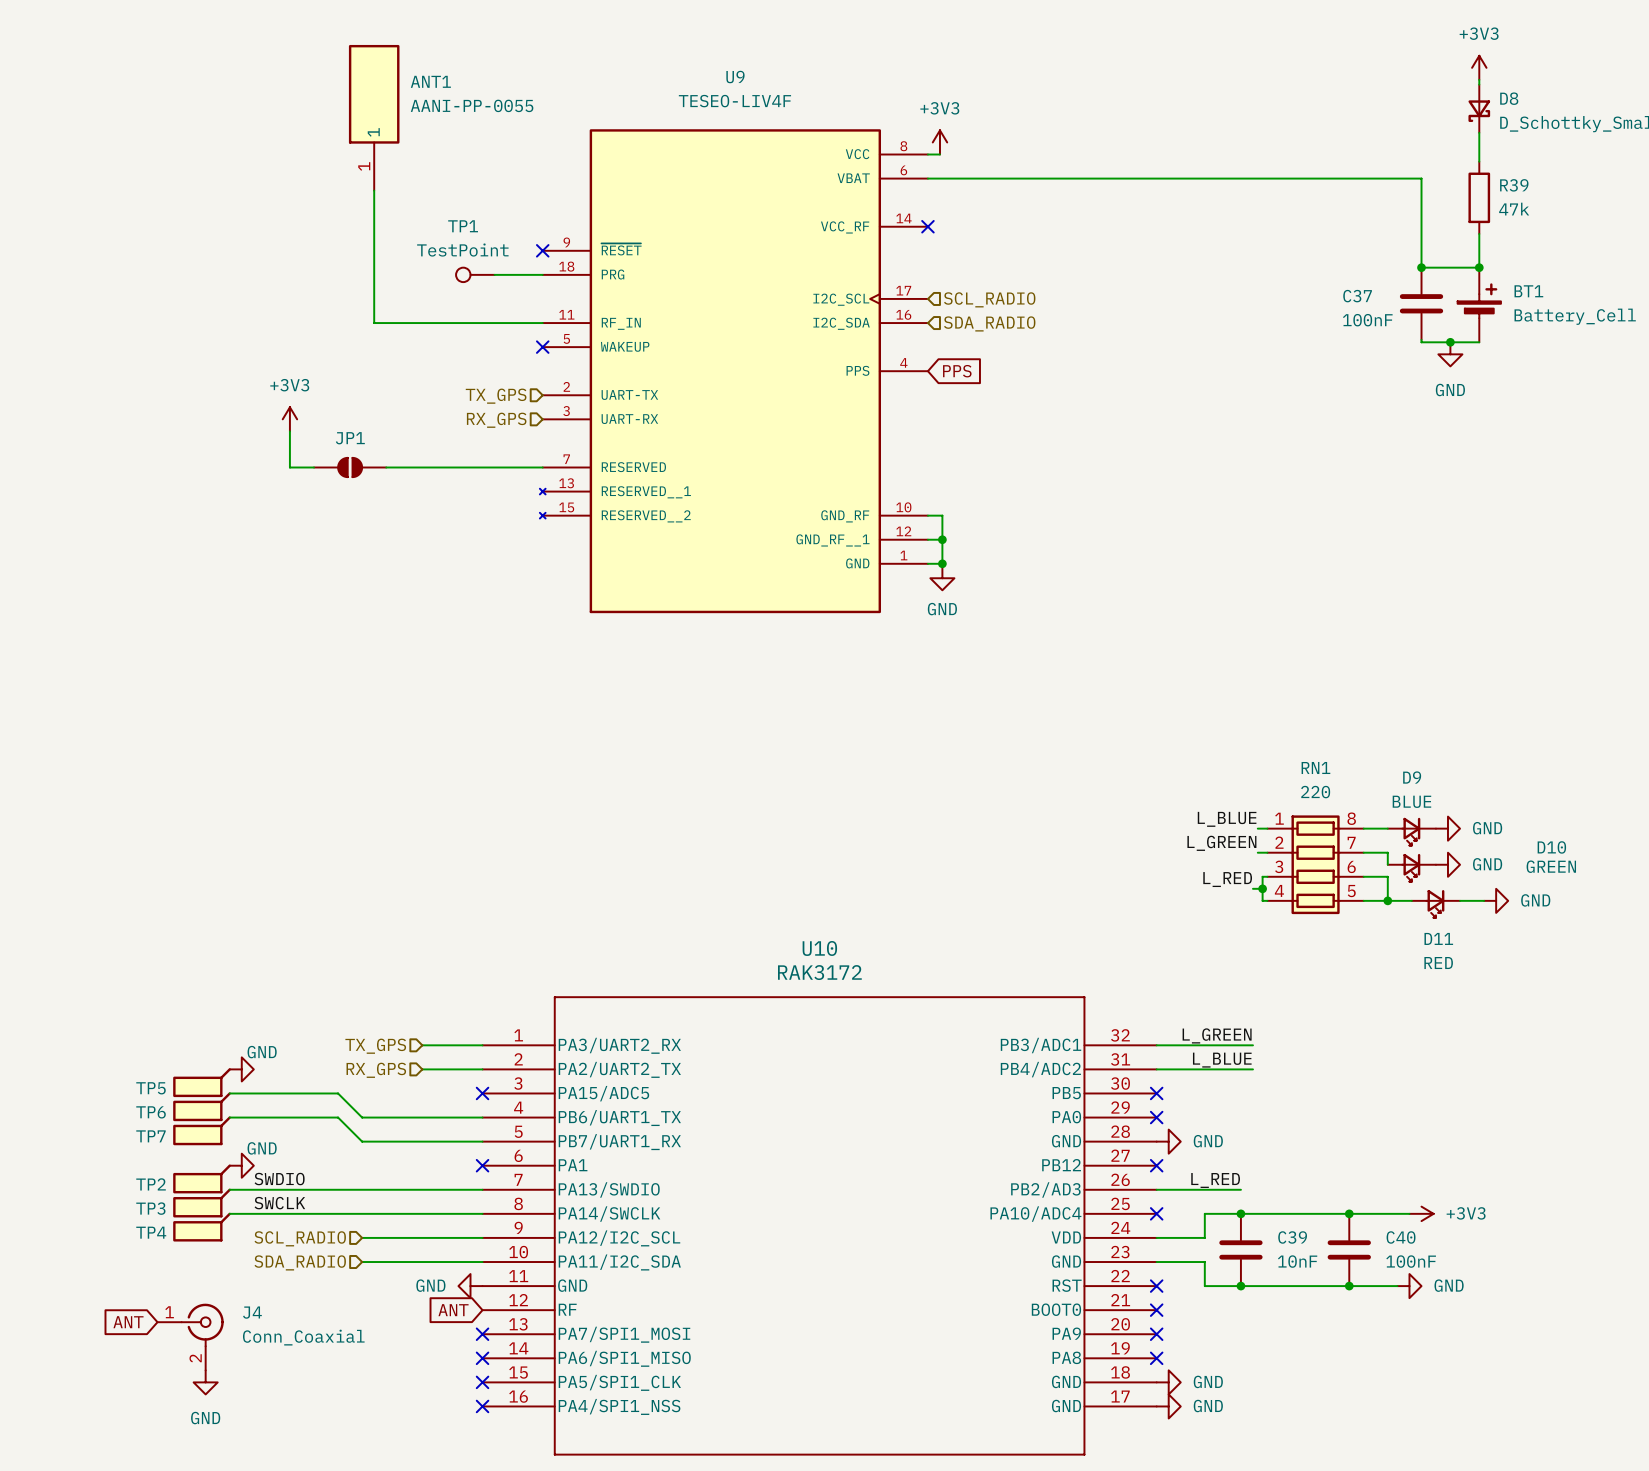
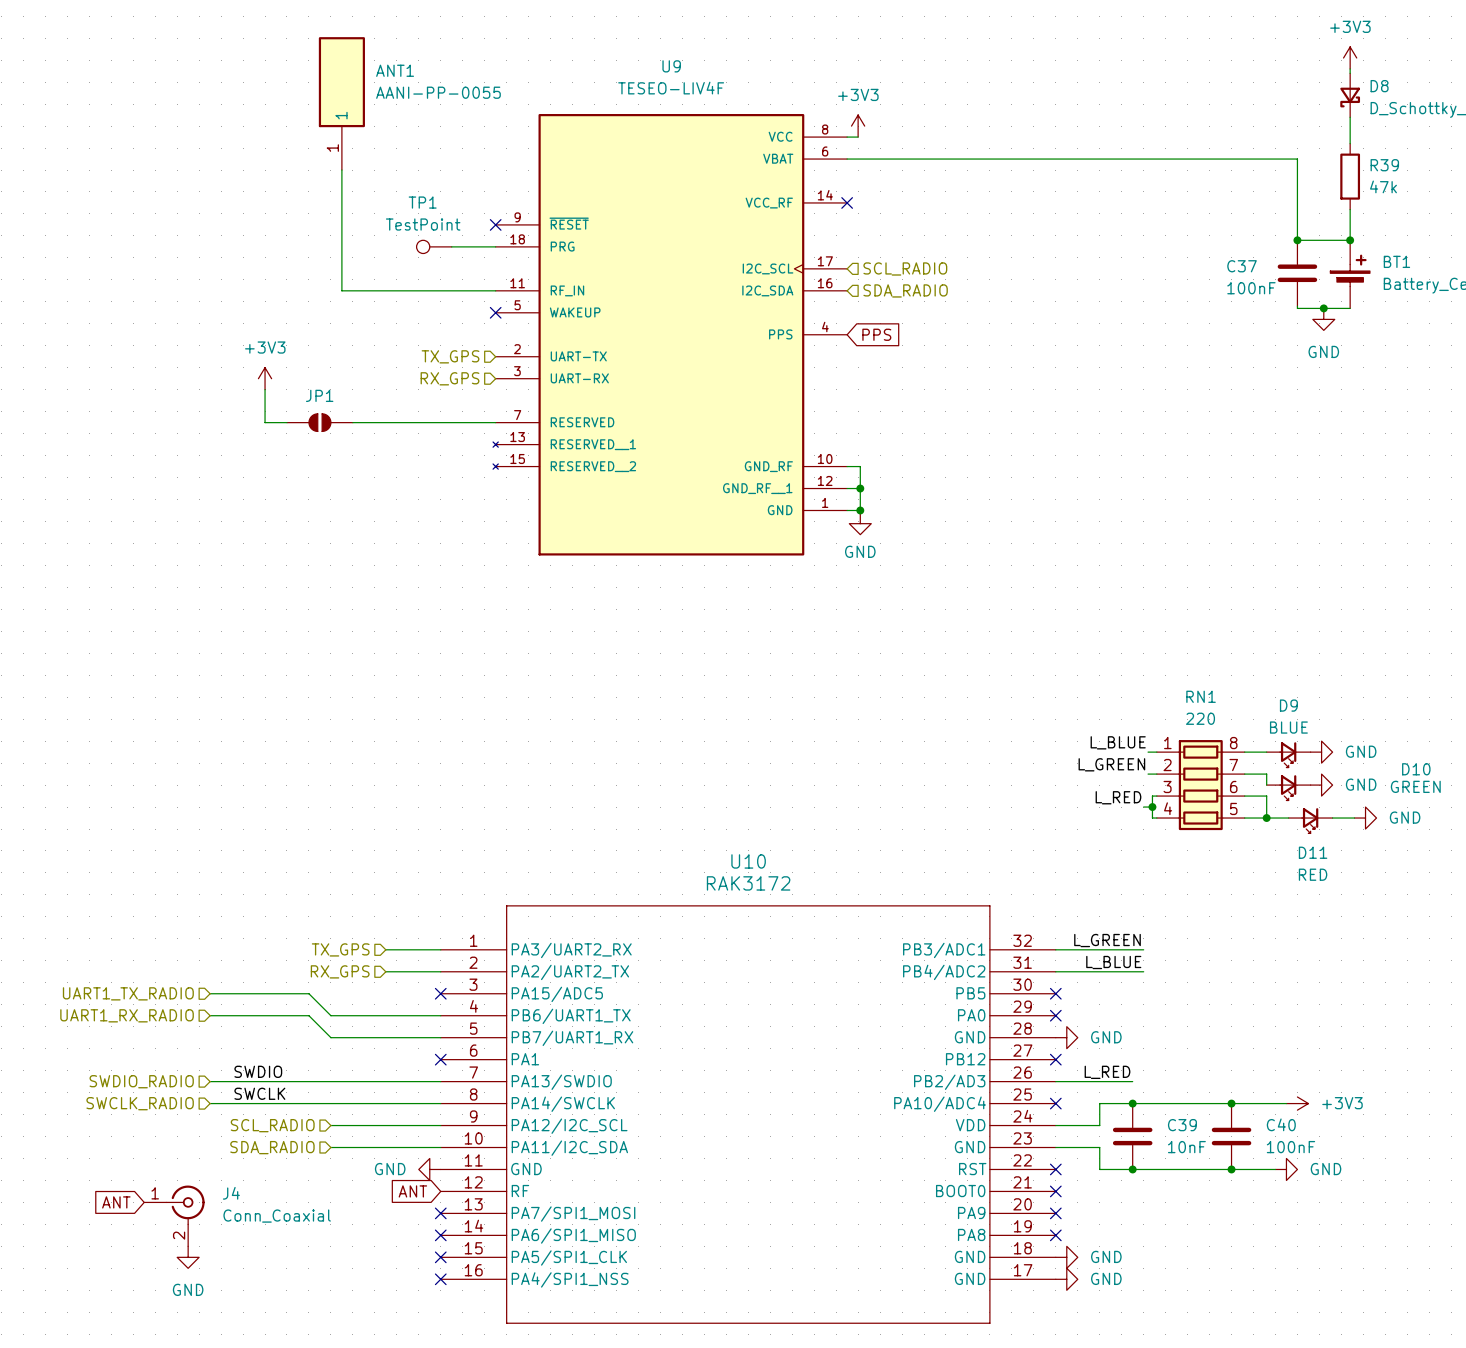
power symbol: GND (241, 1069) -> none
TP5: (202, 1082) -> none
hierarchical label: none -> UART1_TX_RADIO (128, 993)
TP6: (202, 1106) -> none
hierarchical label: none -> UART1_RX_RADIO (127, 1015)
TP7: (202, 1130) -> none
power symbol: GND (241, 1165) -> none
TP2: (202, 1178) -> none
hierarchical label: none -> SWDIO_RADIO (141, 1081)
TP3: (202, 1203) -> none
hierarchical label: none -> SWCLK_RADIO (140, 1103)
TP4: (202, 1227) -> none

